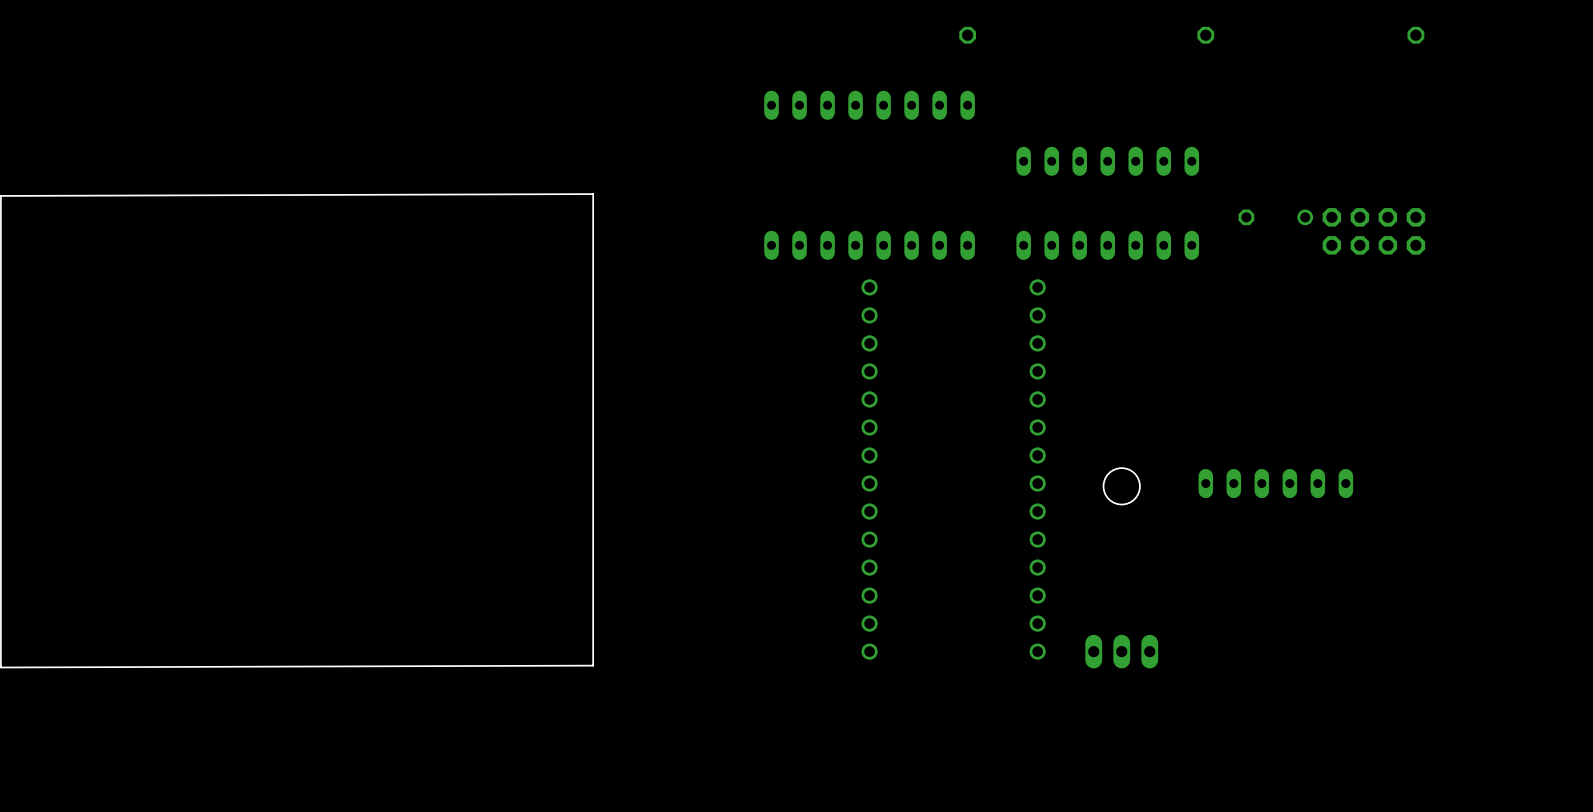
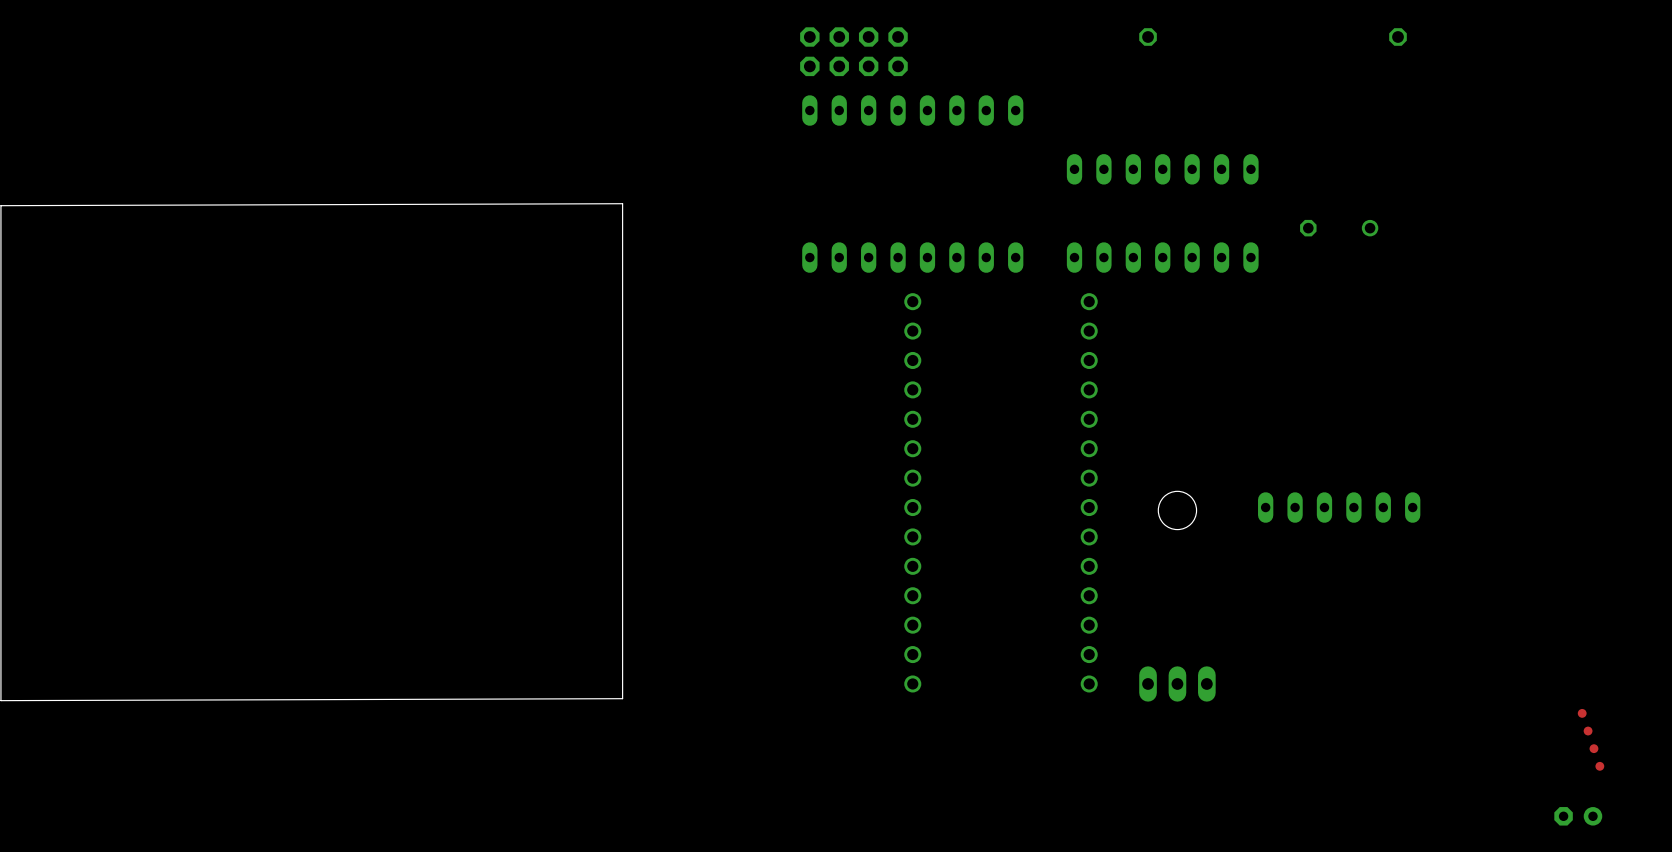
part: (967, 35) -> none
part: none -> (1148, 36)
part: (1205, 35) -> none
part: none -> (1398, 36)
part: (1415, 35) -> none
part: none -> (853, 51)
part: (1373, 231) -> none
part: none -> (1582, 713)
part: none -> (1588, 731)
part: none -> (1593, 748)
part: none -> (1599, 766)
part: none -> (1578, 816)

